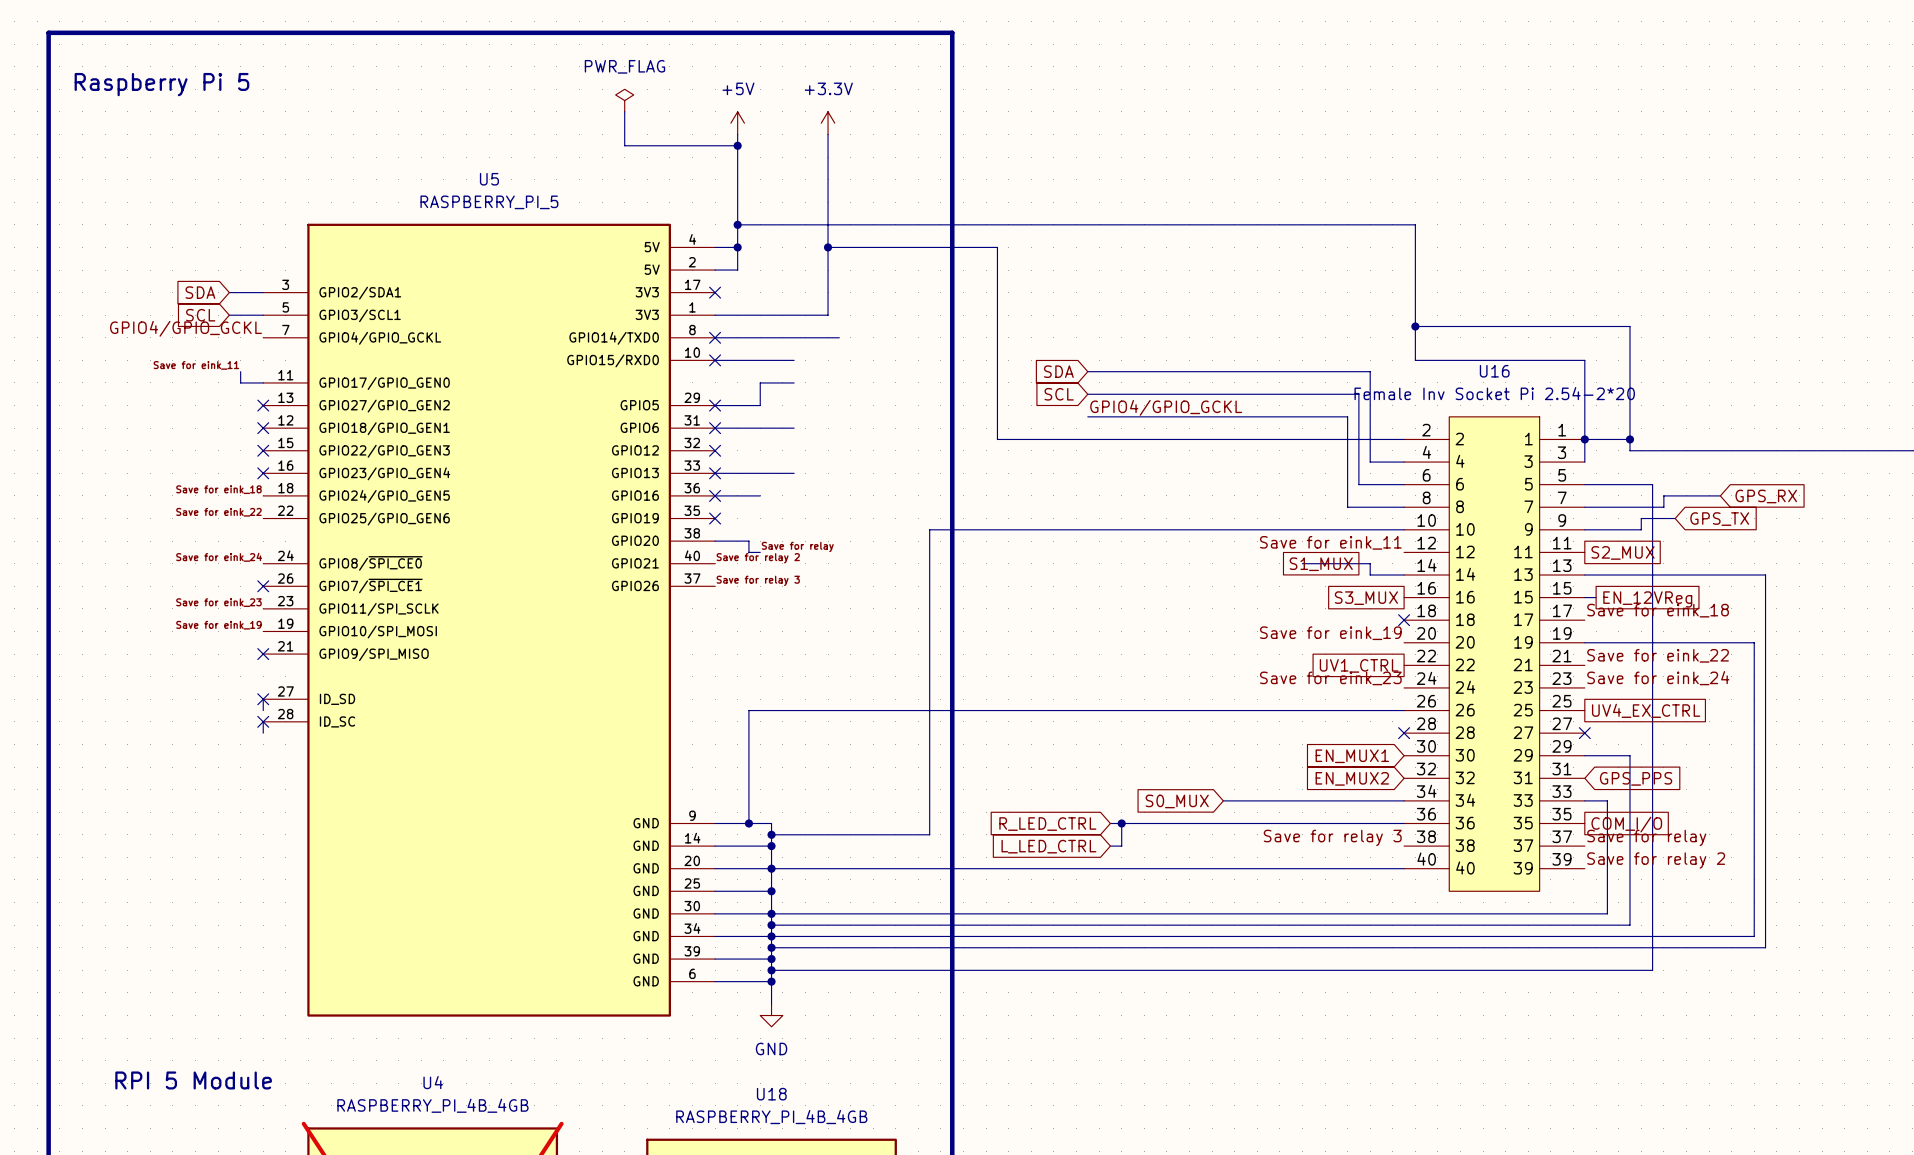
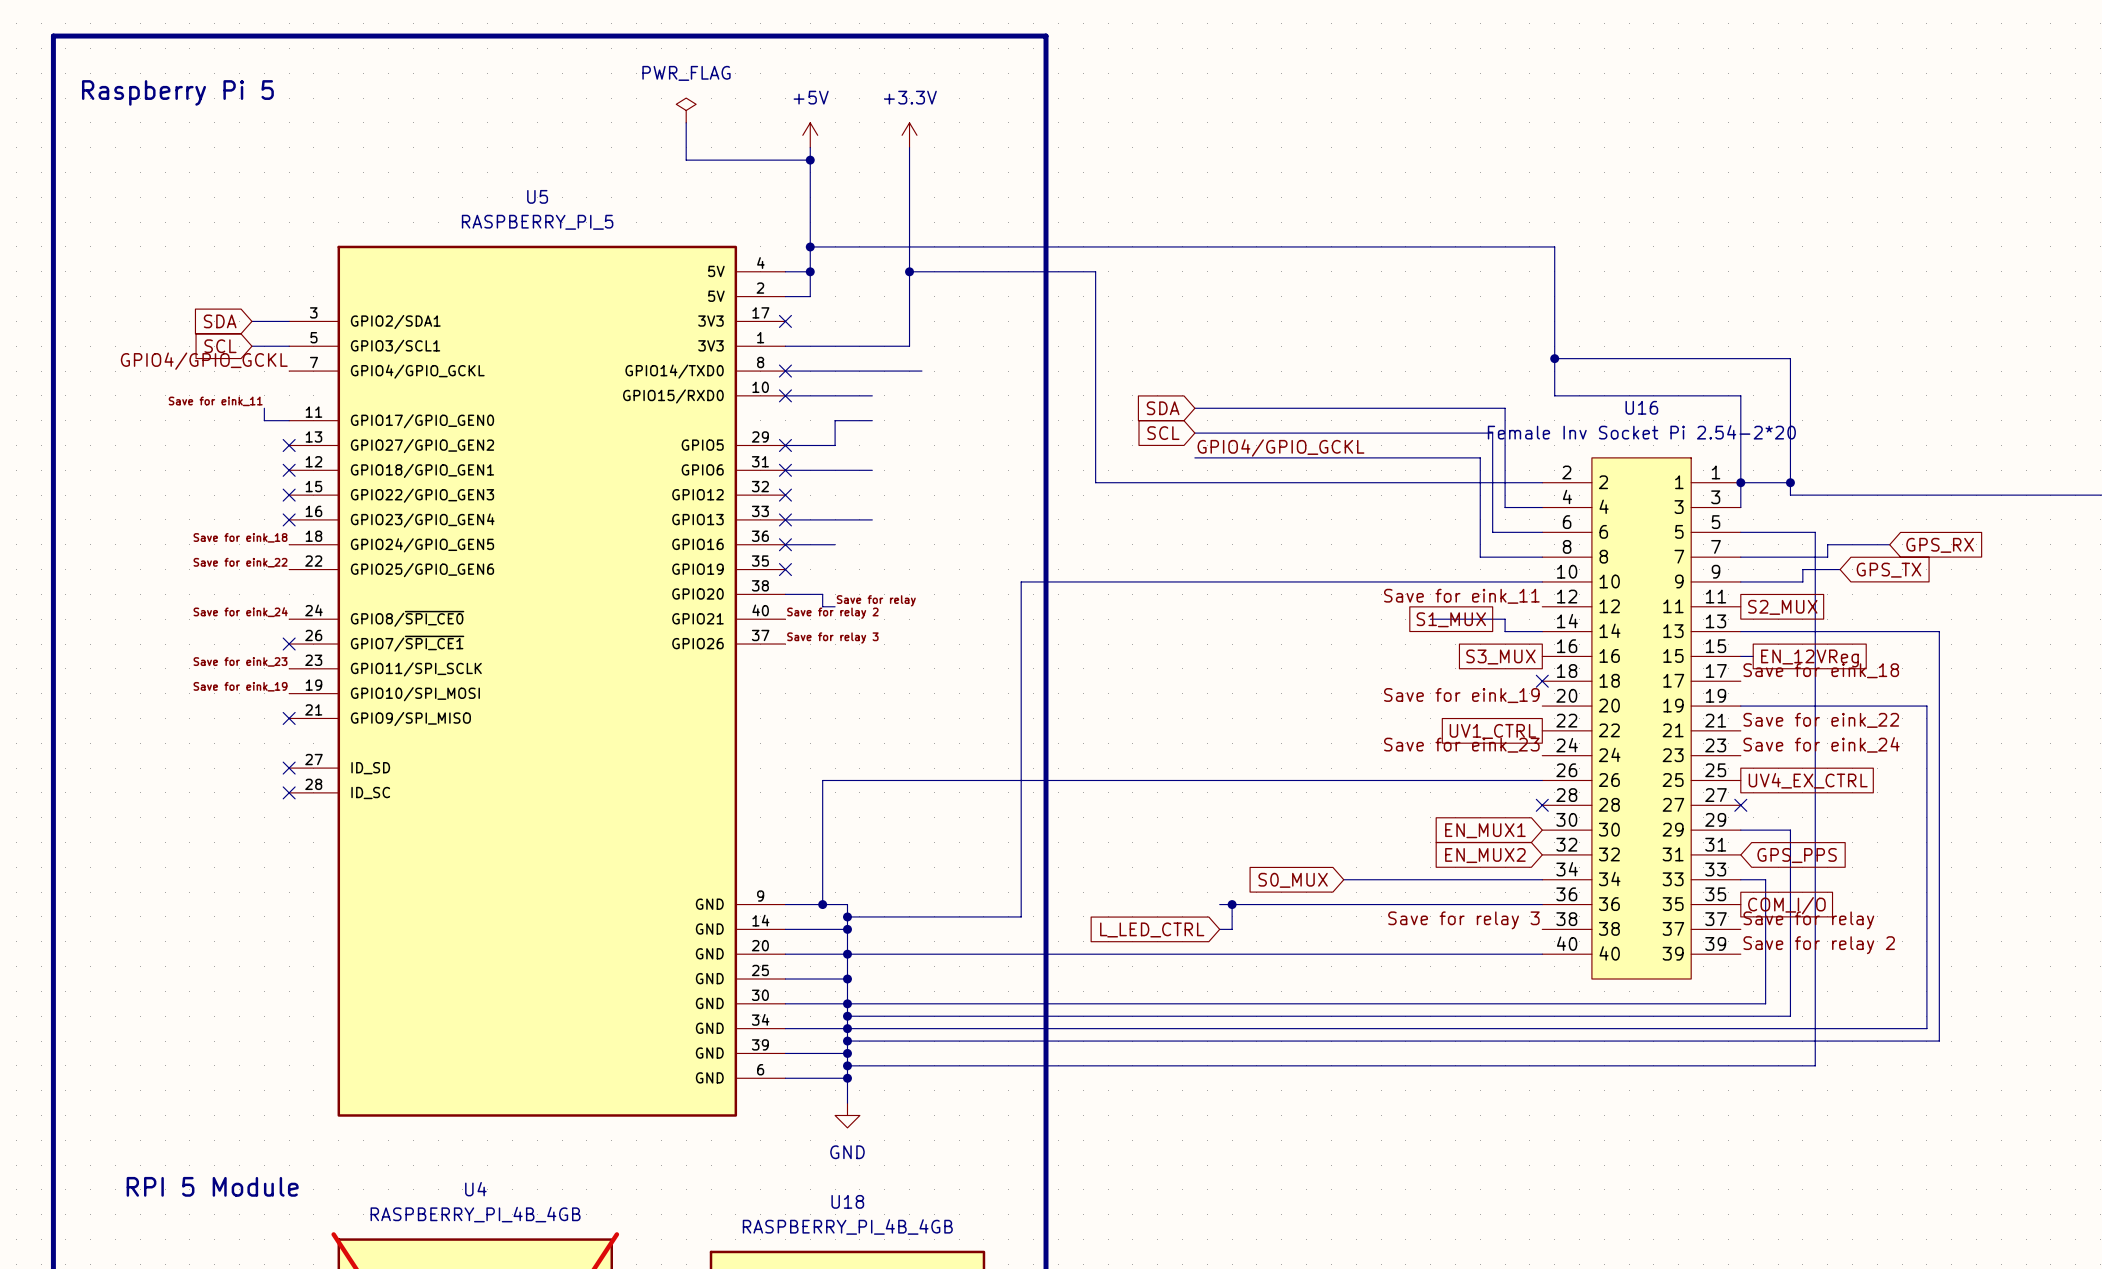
wire: (263, 699) (263, 710) -> none
wire: (263, 721) (263, 733) -> none
global label: R_LED_CTRL (1047, 824) -> none

